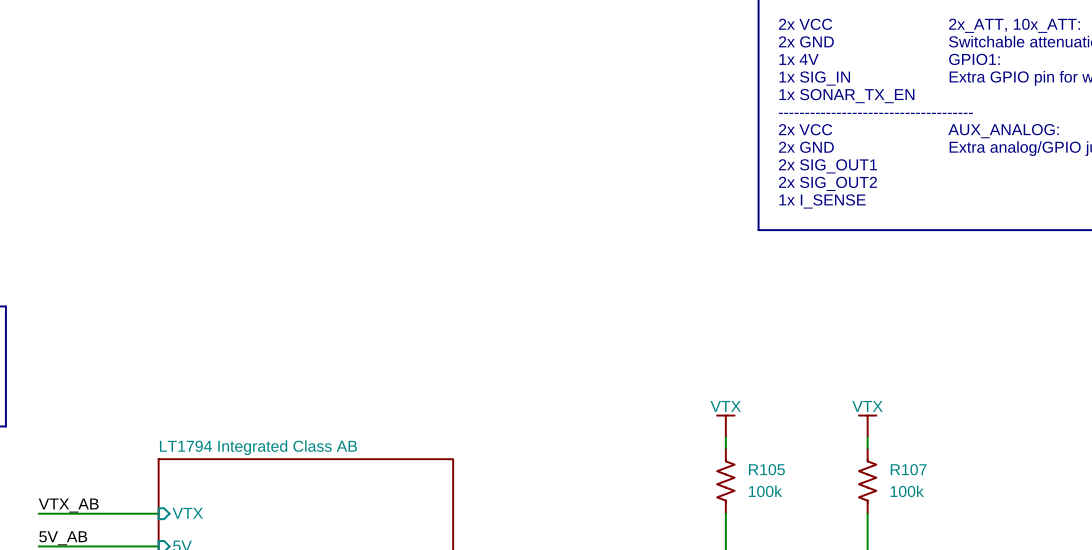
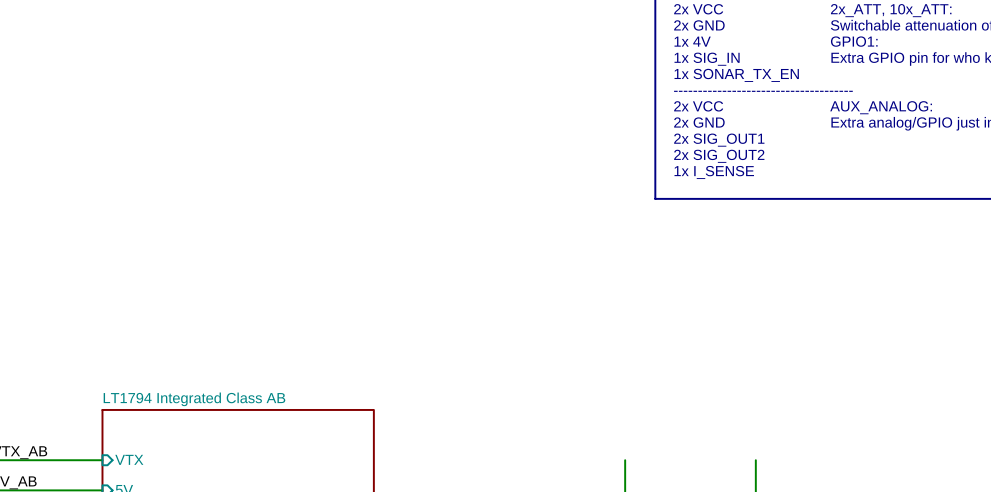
power symbol: VTX (725, 426) -> none
power symbol: VTX (867, 426) -> none
wire: (725, 437) (725, 448) -> none
wire: (867, 437) (867, 448) -> none
R105: 100k (725, 481) -> none
R107: 100k (867, 481) -> none

